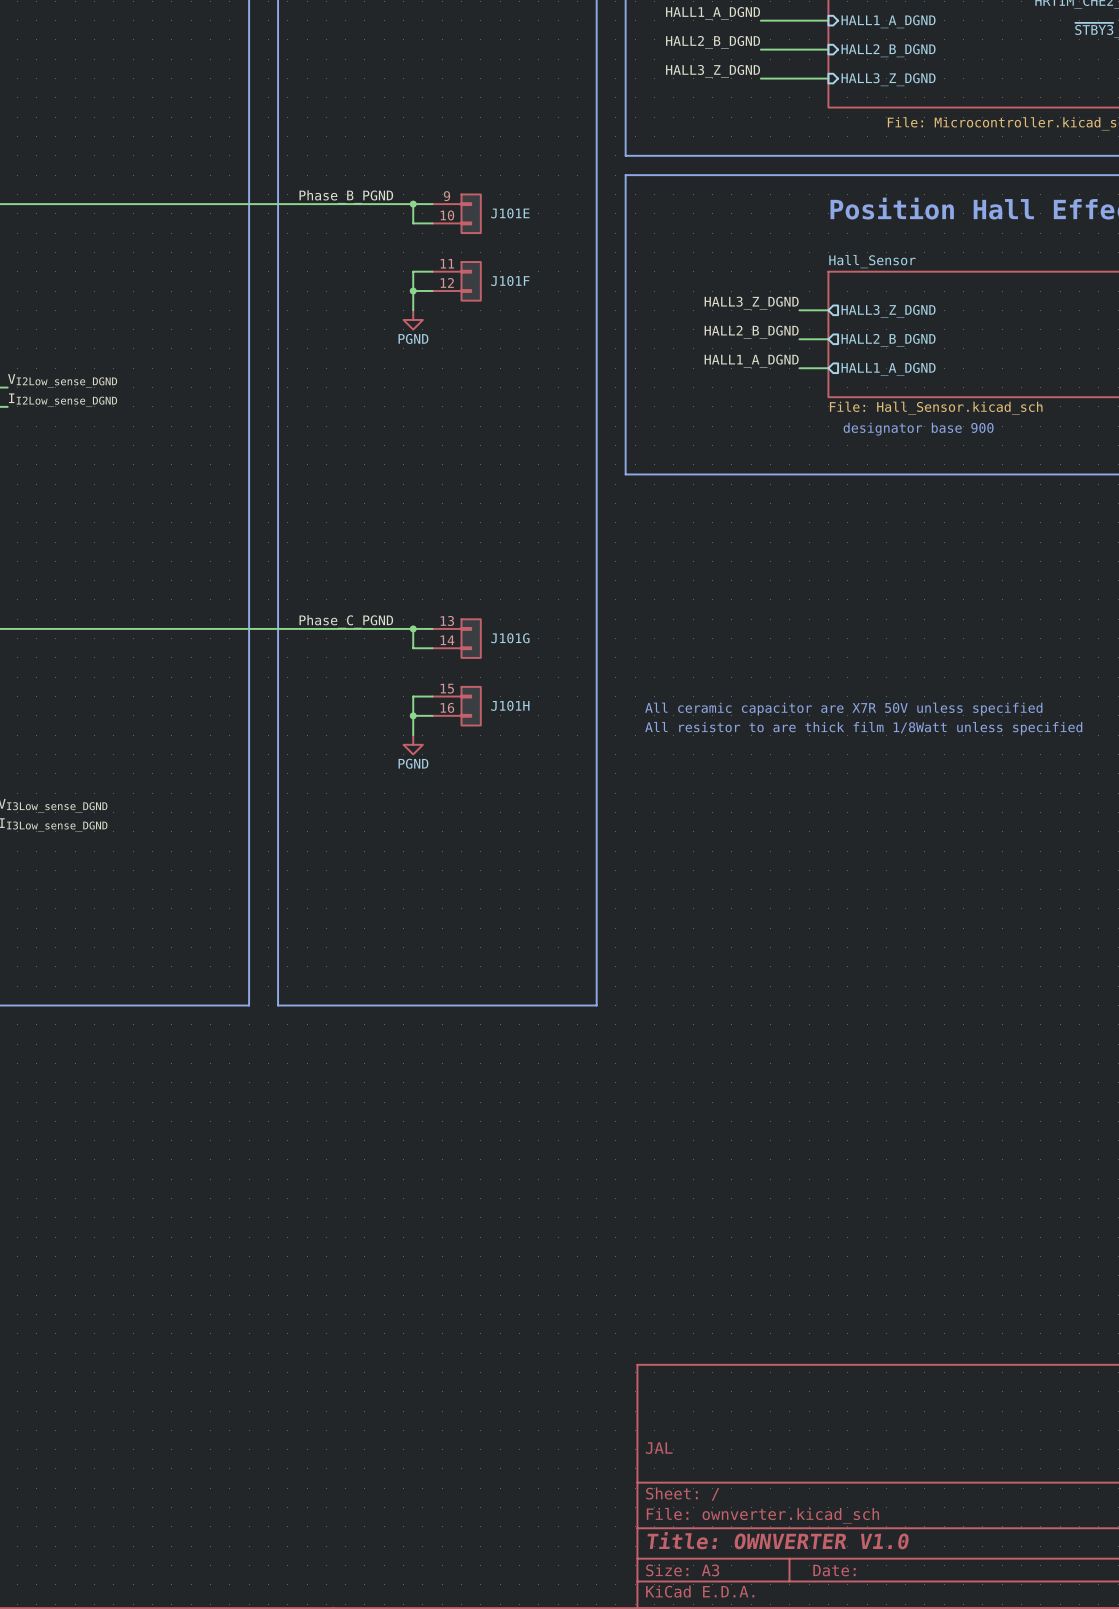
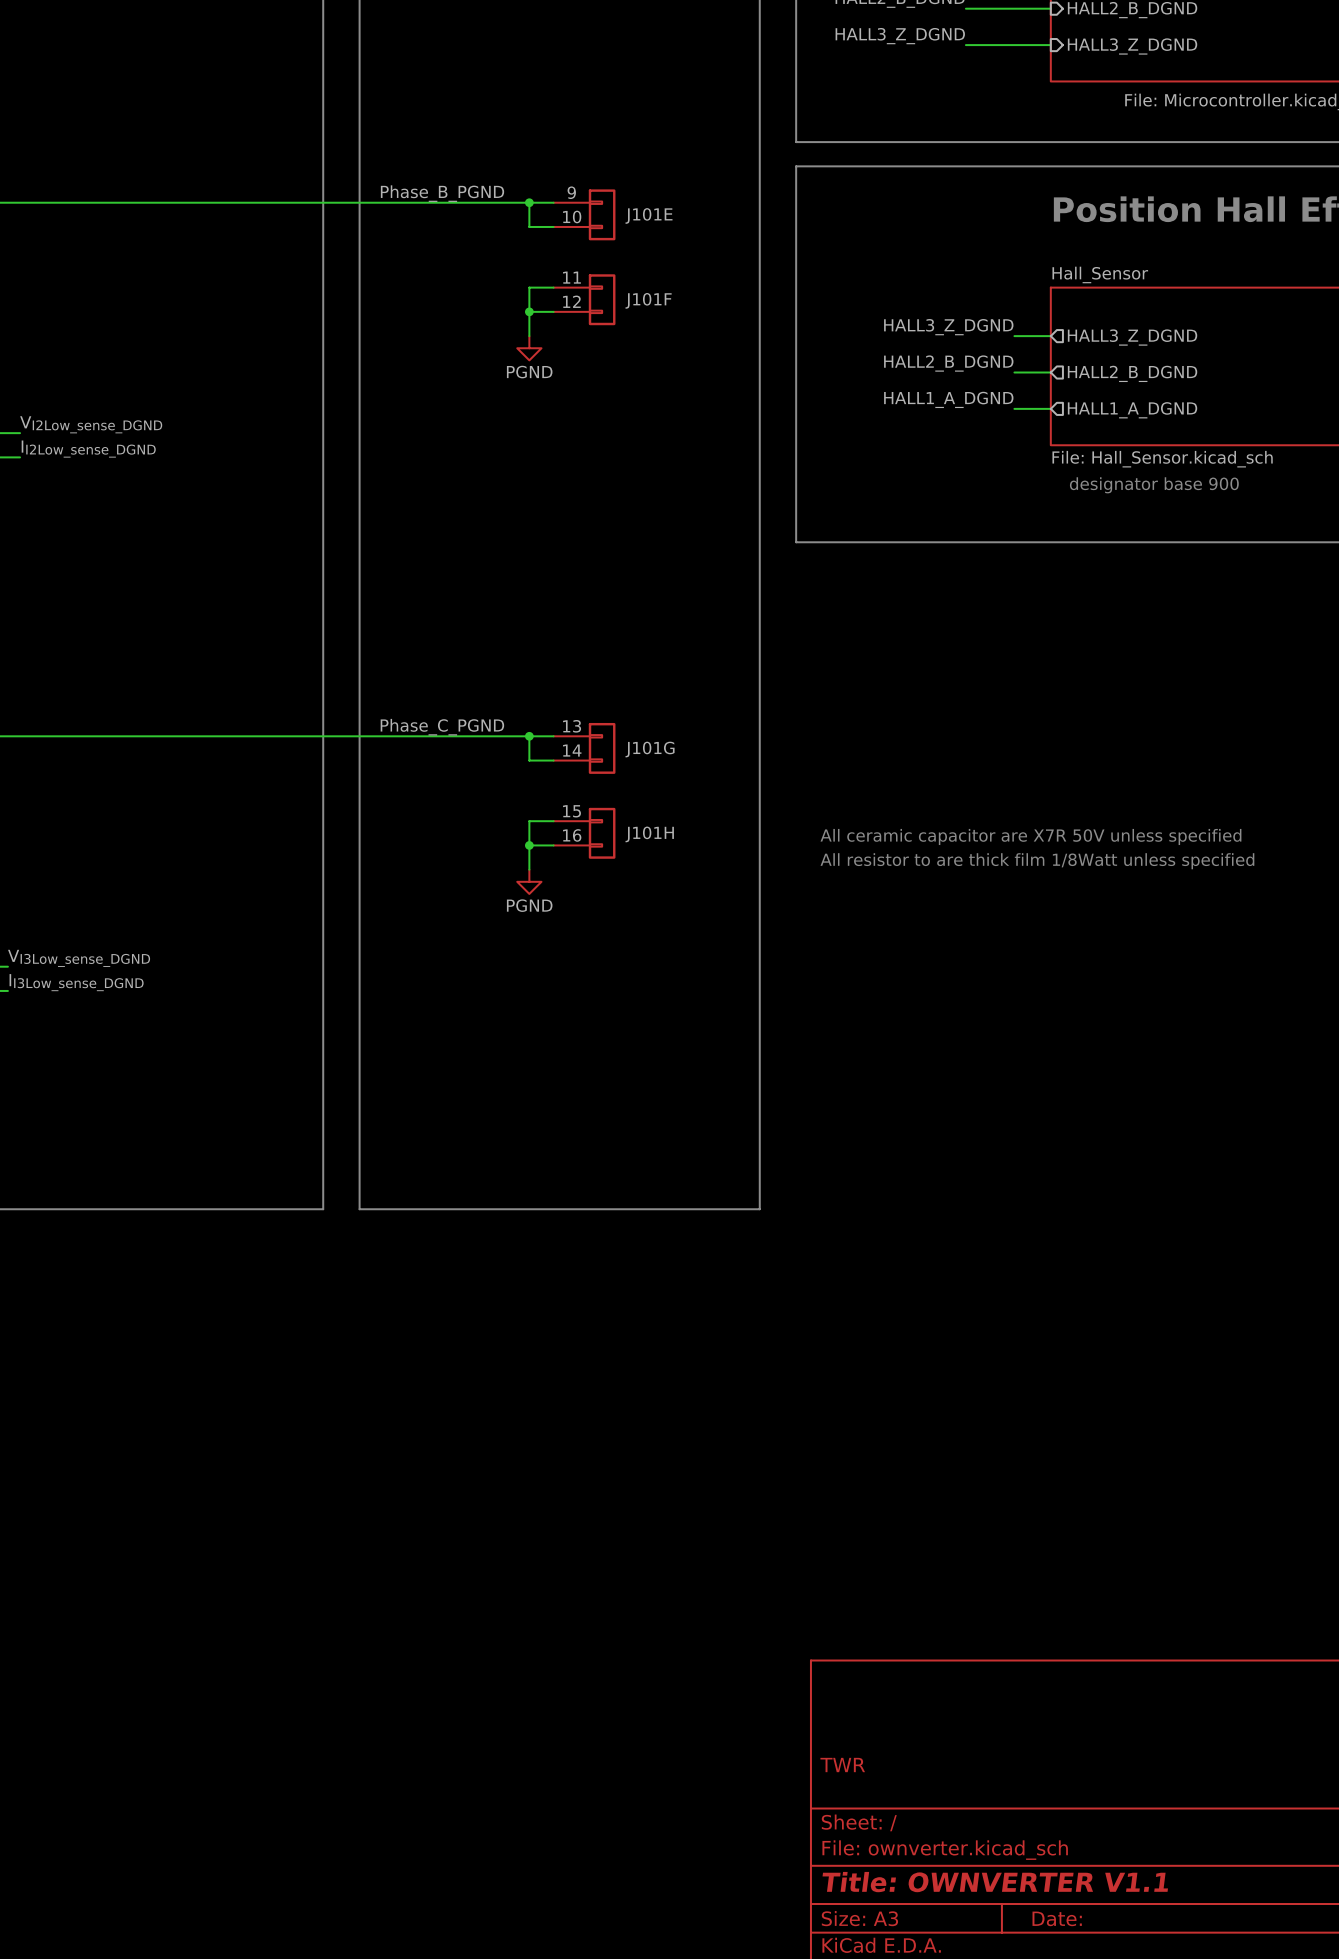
title block: JAL (659, 1448) -> TWR (842, 1765)
title block: Title: OWNVERTER V1.0 (778, 1540) -> Title: OWNVERTER V1.1 (995, 1882)

